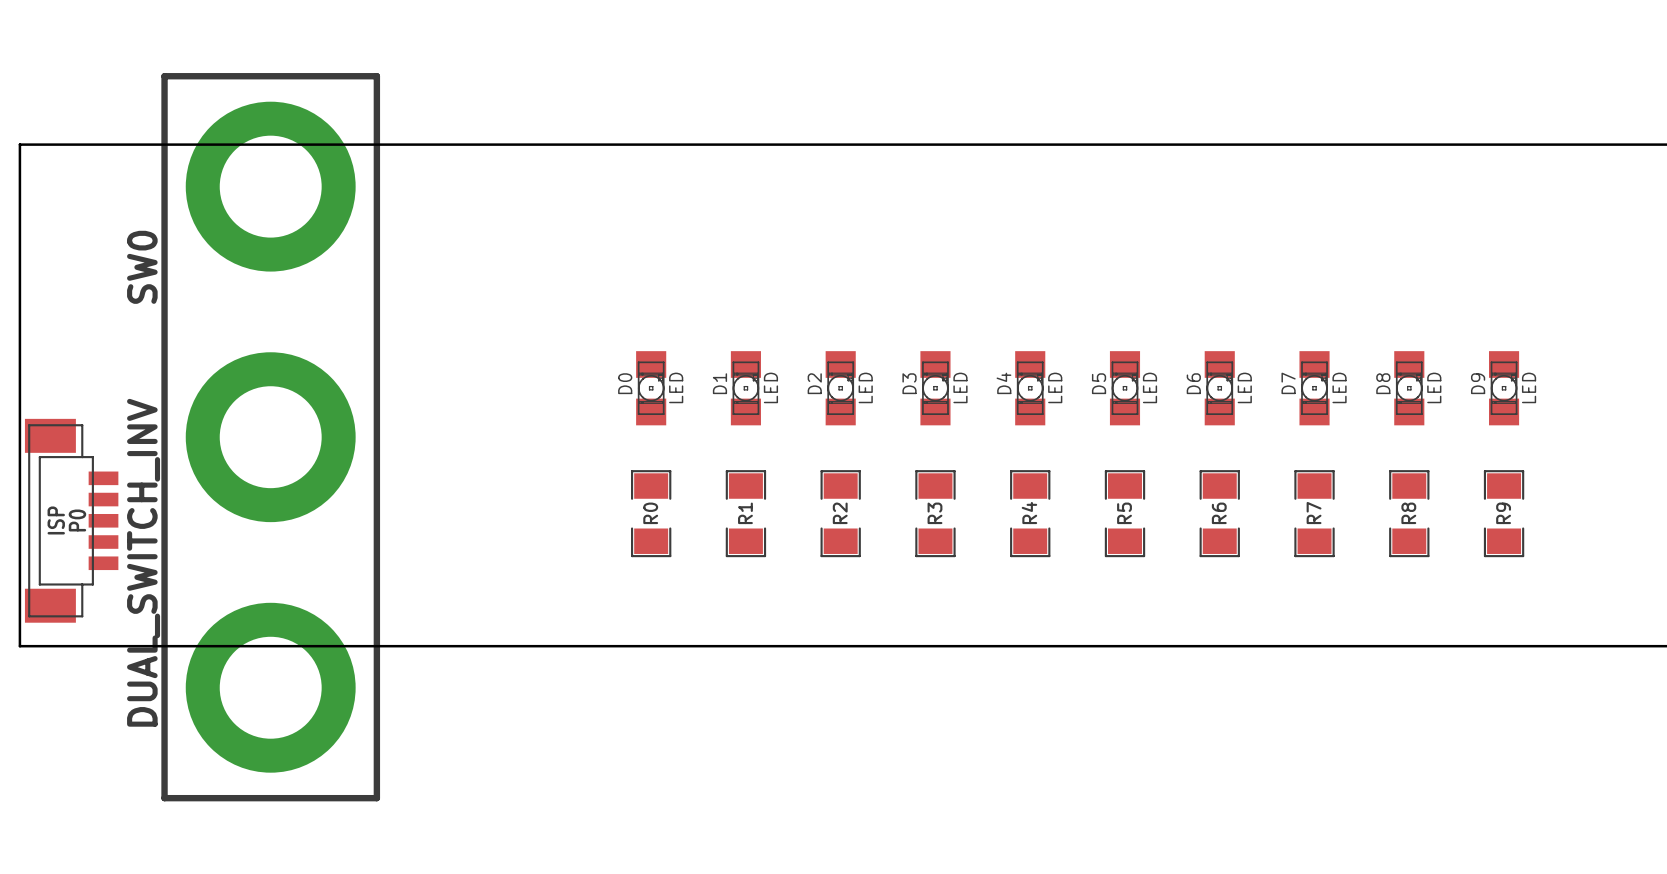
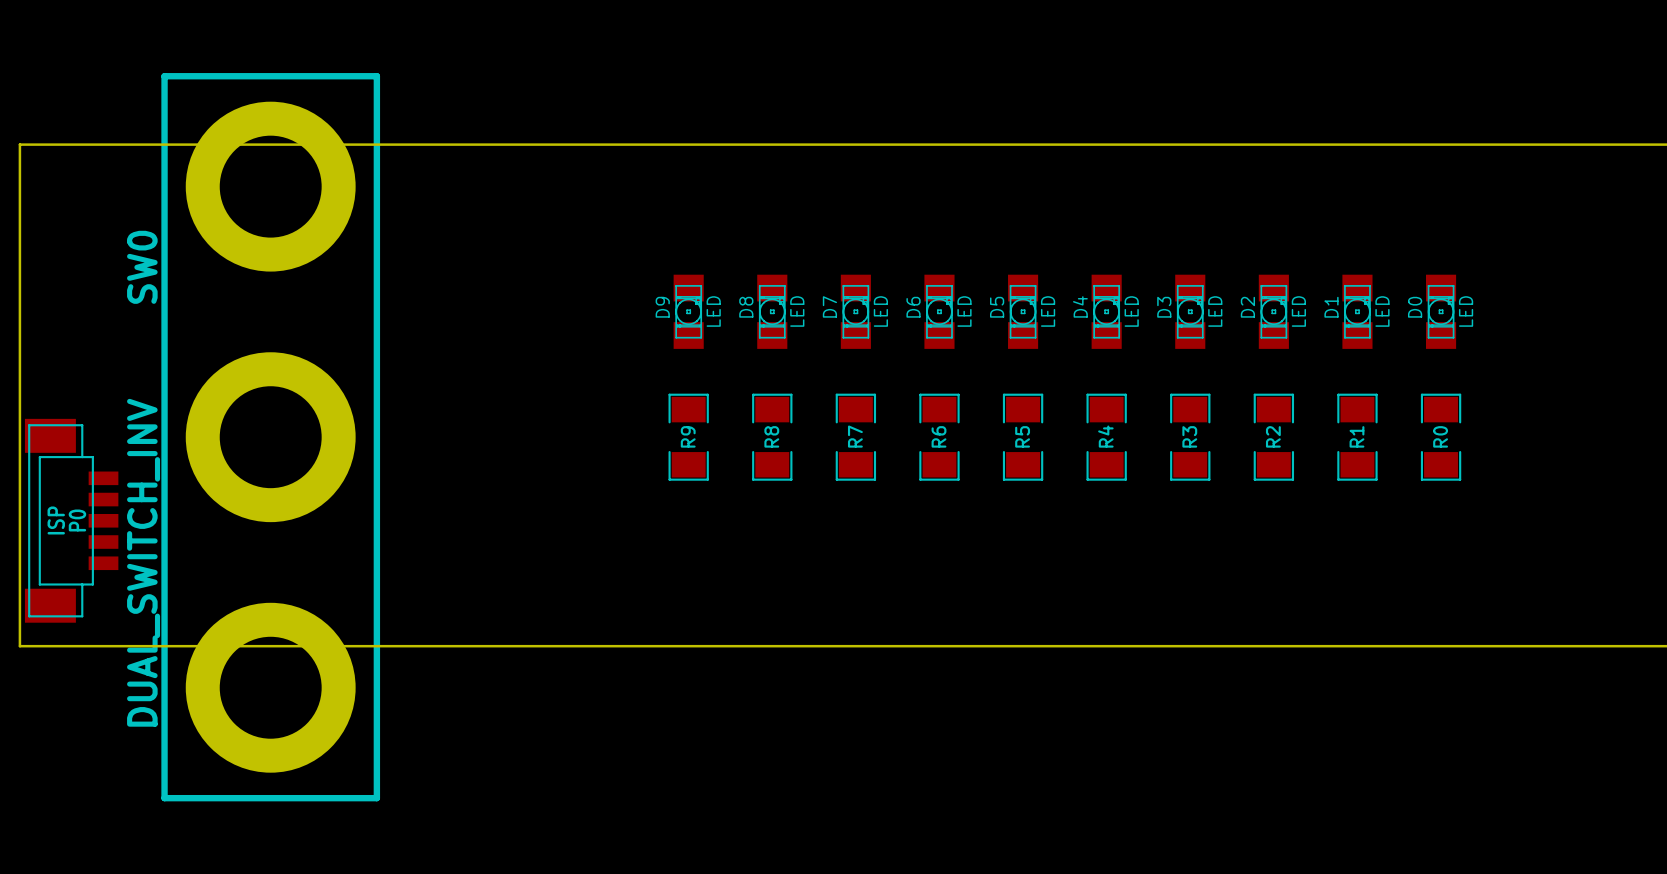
D0 position: (651, 388) -> (1441, 311)
D1 position: (745, 388) -> (1357, 311)
D2 position: (840, 388) -> (1273, 311)
D3 position: (935, 388) -> (1190, 311)
D4 position: (1030, 388) -> (1106, 311)
D5 position: (1124, 388) -> (1023, 311)
D6 position: (1219, 388) -> (939, 311)
D7 position: (1314, 388) -> (855, 311)
D8 position: (1409, 388) -> (772, 311)
D9 position: (1504, 388) -> (688, 311)
R0 position: (651, 513) -> (1441, 437)
R1 position: (745, 513) -> (1357, 437)
R2 position: (840, 513) -> (1273, 437)
R3 position: (935, 513) -> (1190, 437)
R4 position: (1030, 513) -> (1106, 437)
R5 position: (1124, 513) -> (1023, 437)
R6 position: (1219, 513) -> (939, 437)
R7 position: (1314, 513) -> (855, 437)
R8 position: (1409, 513) -> (772, 437)
R9 position: (1504, 513) -> (688, 437)

